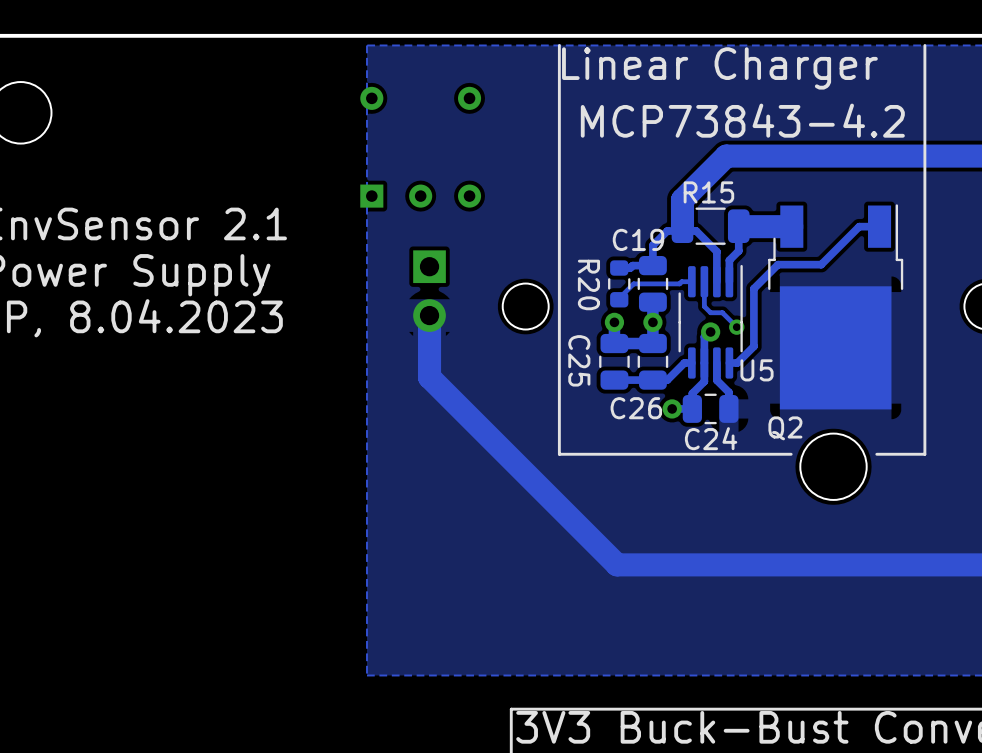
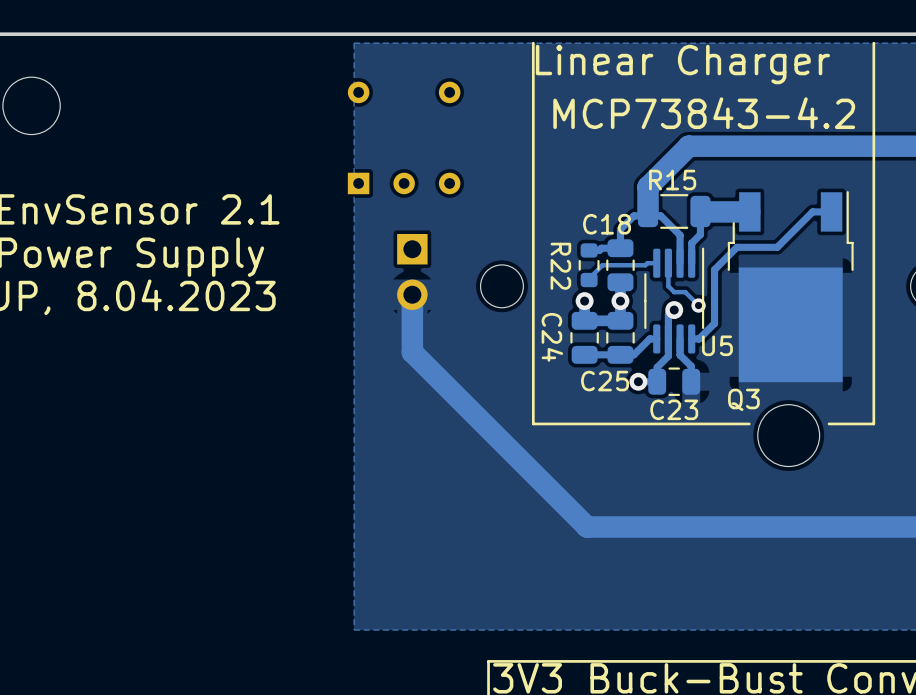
C19 name: C19 (638, 239) -> C18 (607, 224)
R20 name: R20 (588, 284) -> R22 (560, 266)
C25 name: C25 (579, 360) -> C24 (552, 337)
C26 name: C26 (636, 408) -> C25 (605, 381)
Q2 name: Q2 (785, 428) -> Q3 (743, 399)
C24 name: C24 (711, 438) -> C23 (674, 409)

